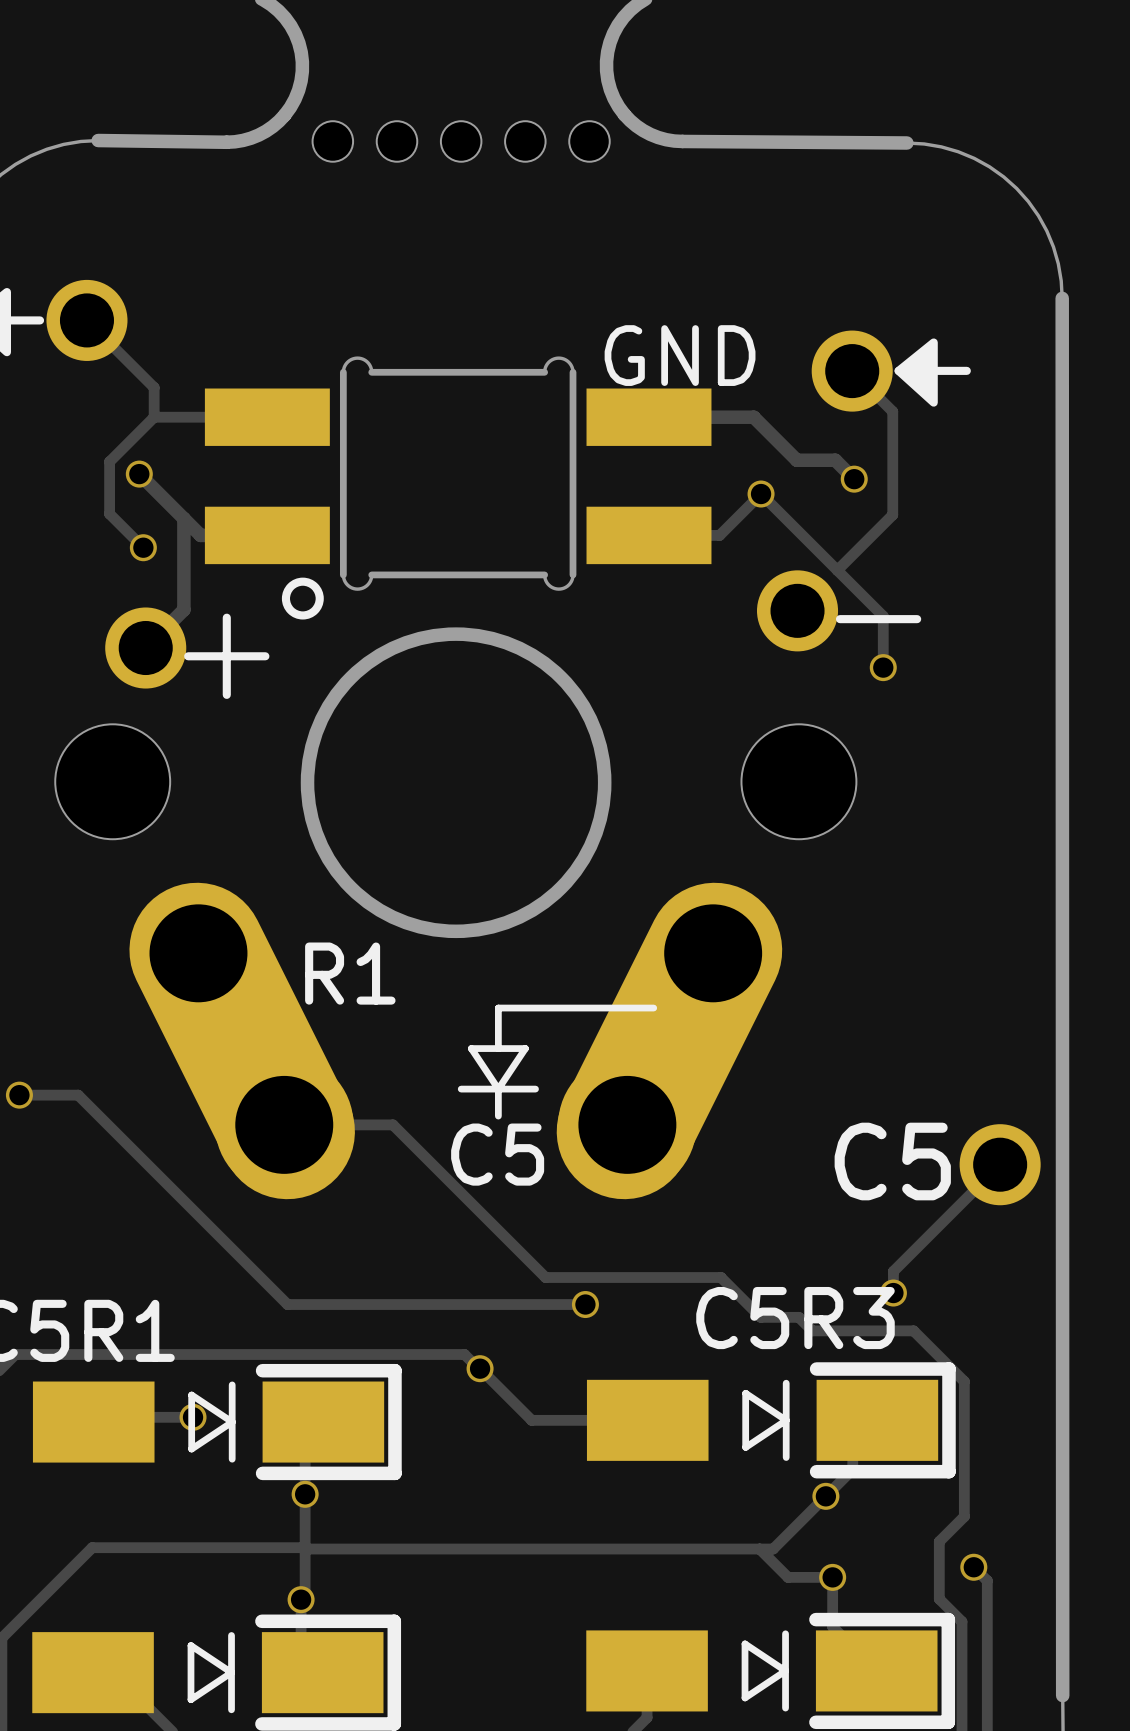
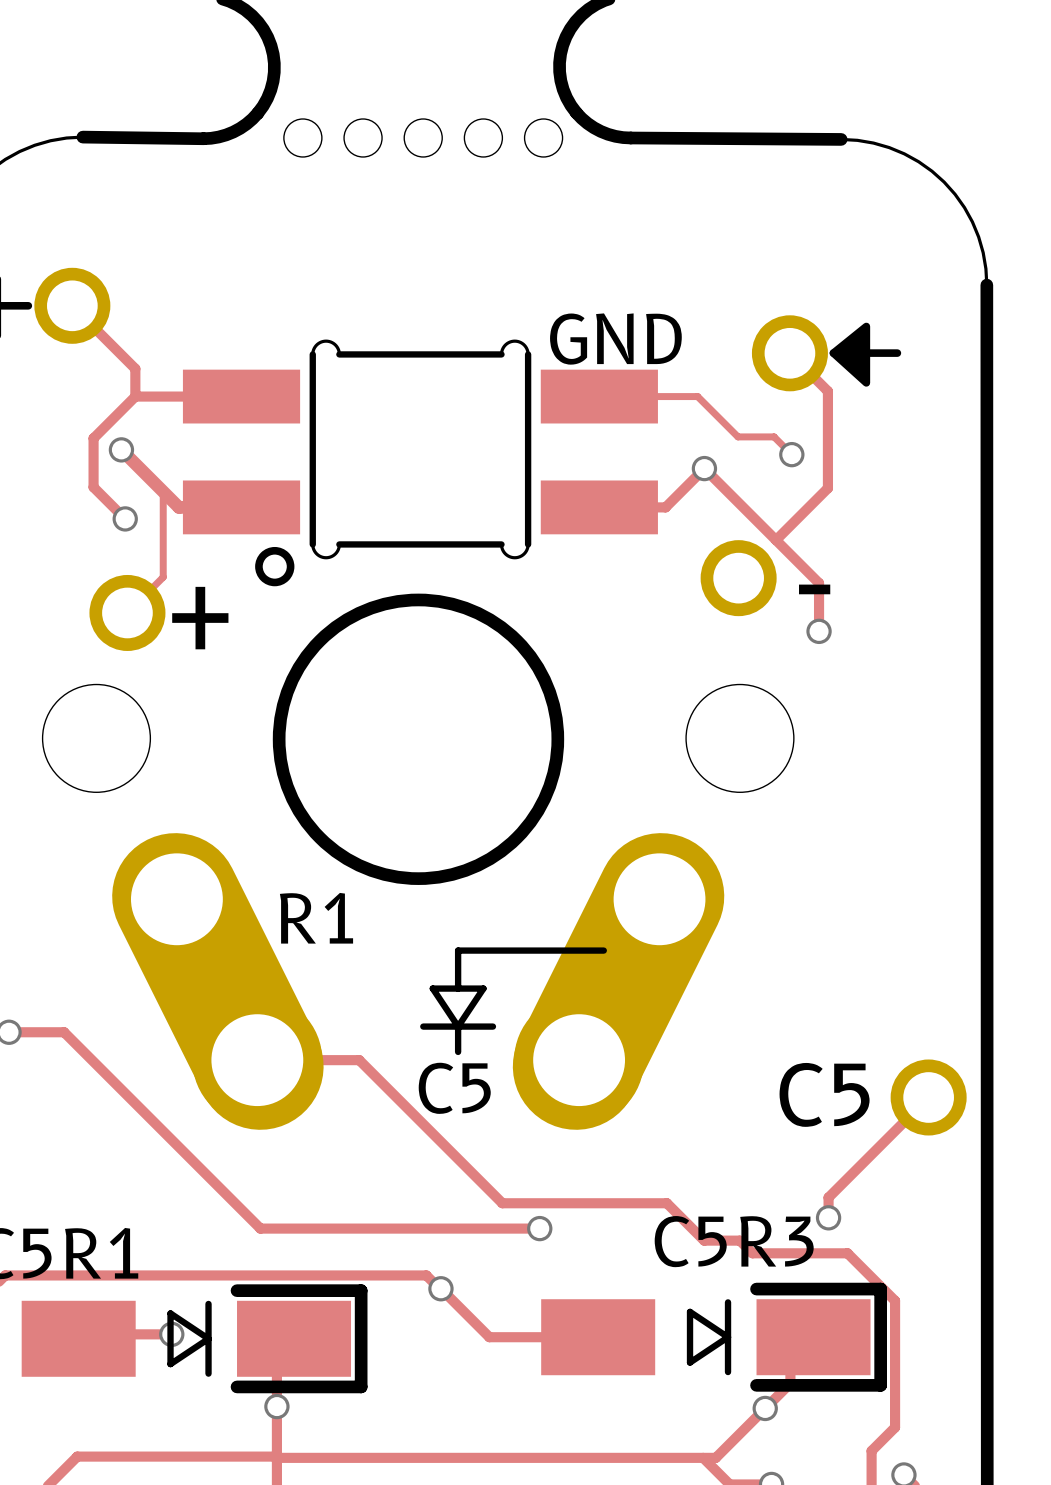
track width: thick (648, 417) (753, 417) (796, 460) (835, 460) (854, 479) -> thin (599, 396) (697, 396) (738, 436) (774, 436) (791, 454)
track width: thick (183, 518) (183, 609) (145, 648) -> thin (163, 491) (163, 577) (127, 612)

